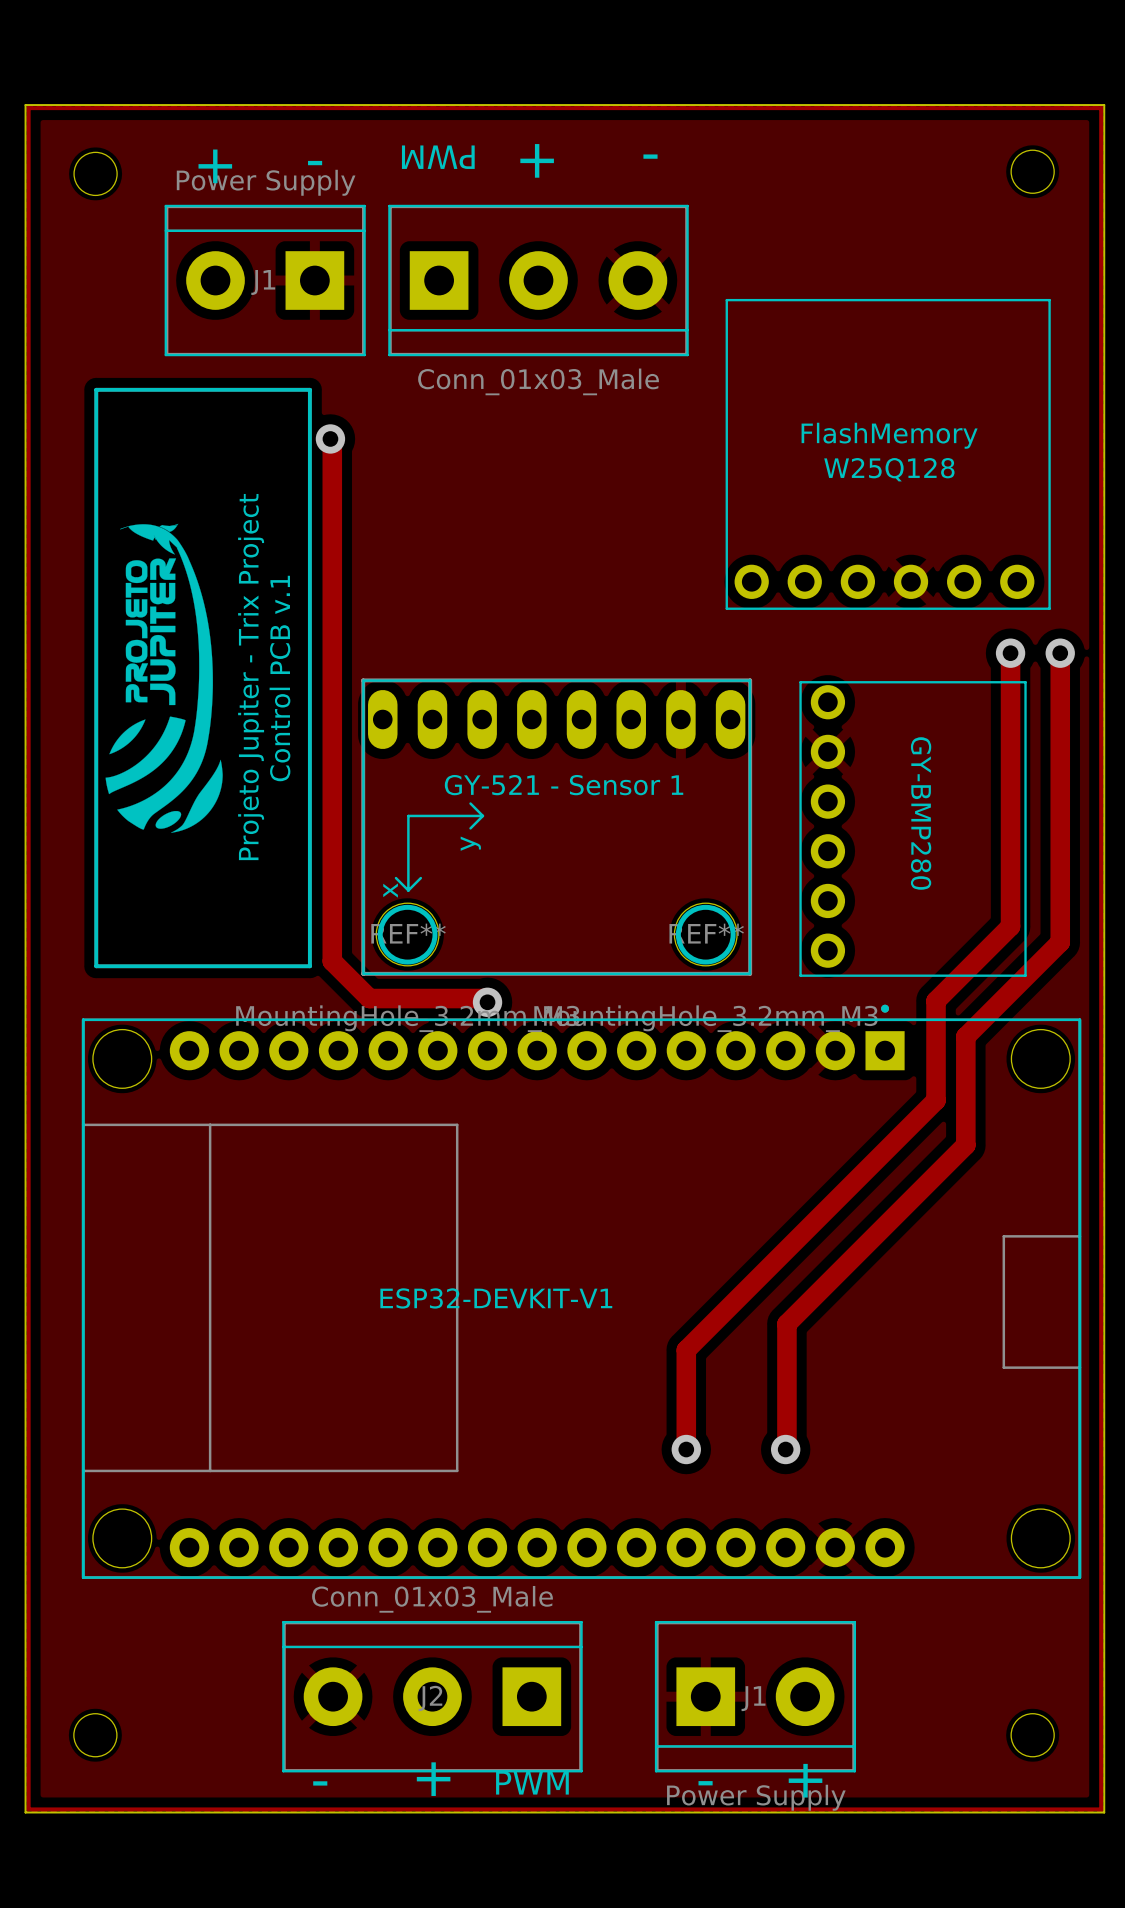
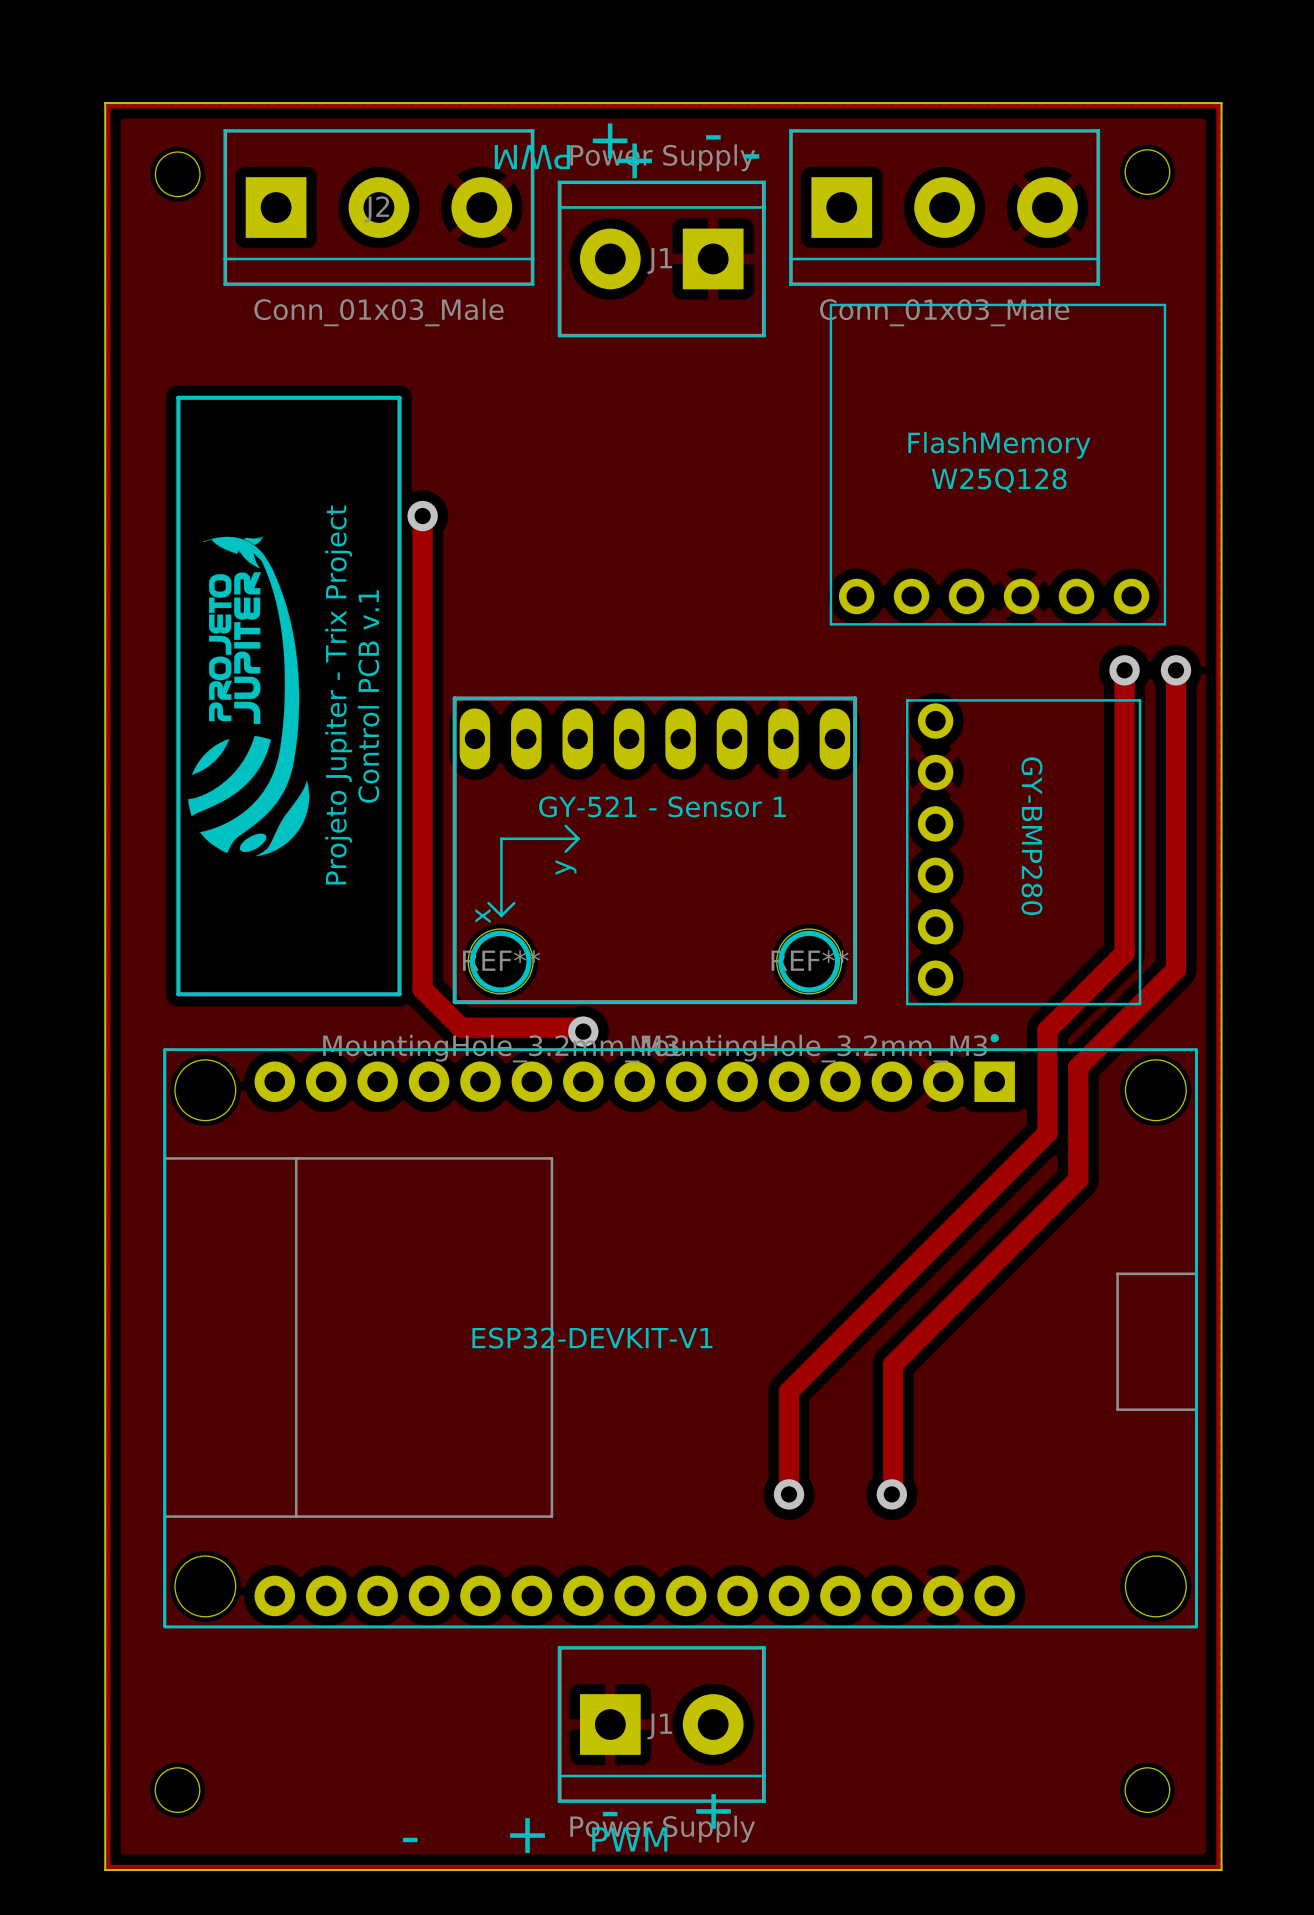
J1 position: (265, 280) -> (661, 258)
part position: (538, 280) -> (944, 207)
track: (330, 438) (332, 440) (332, 504) -> none
via position: (330, 438) -> (422, 516)
J2 rotation: 0° (432, 1696) -> 180° (378, 207)
J2 position: (432, 1696) -> (378, 207)
J1 position: (755, 1696) -> (661, 1724)

